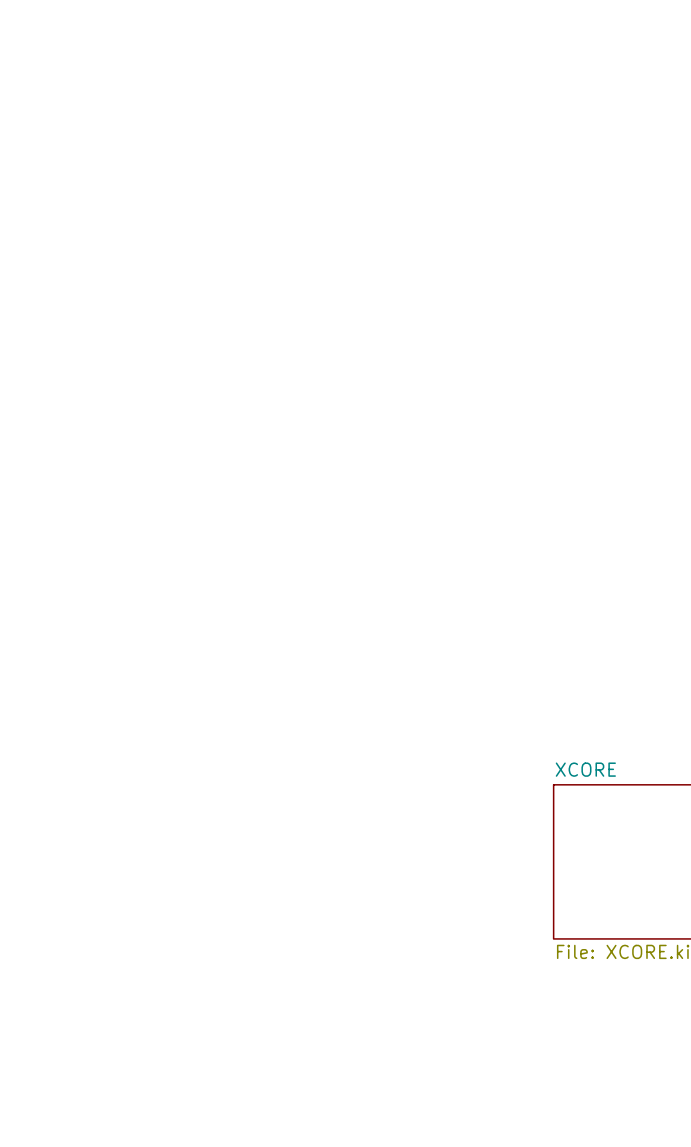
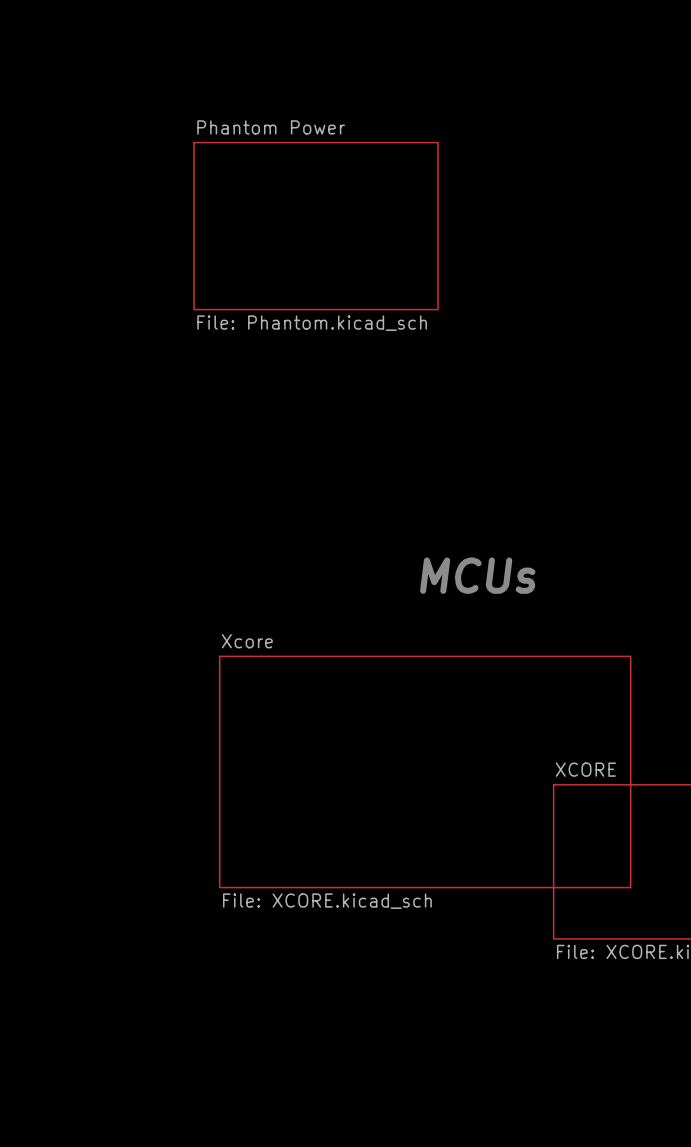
sheet Phantom Power: none -> File: Phantom.kicad_sch (316, 226)
text: none -> MCUs (477, 575)
sheet Xcore: none -> File: XCORE.kicad_sch (425, 771)

